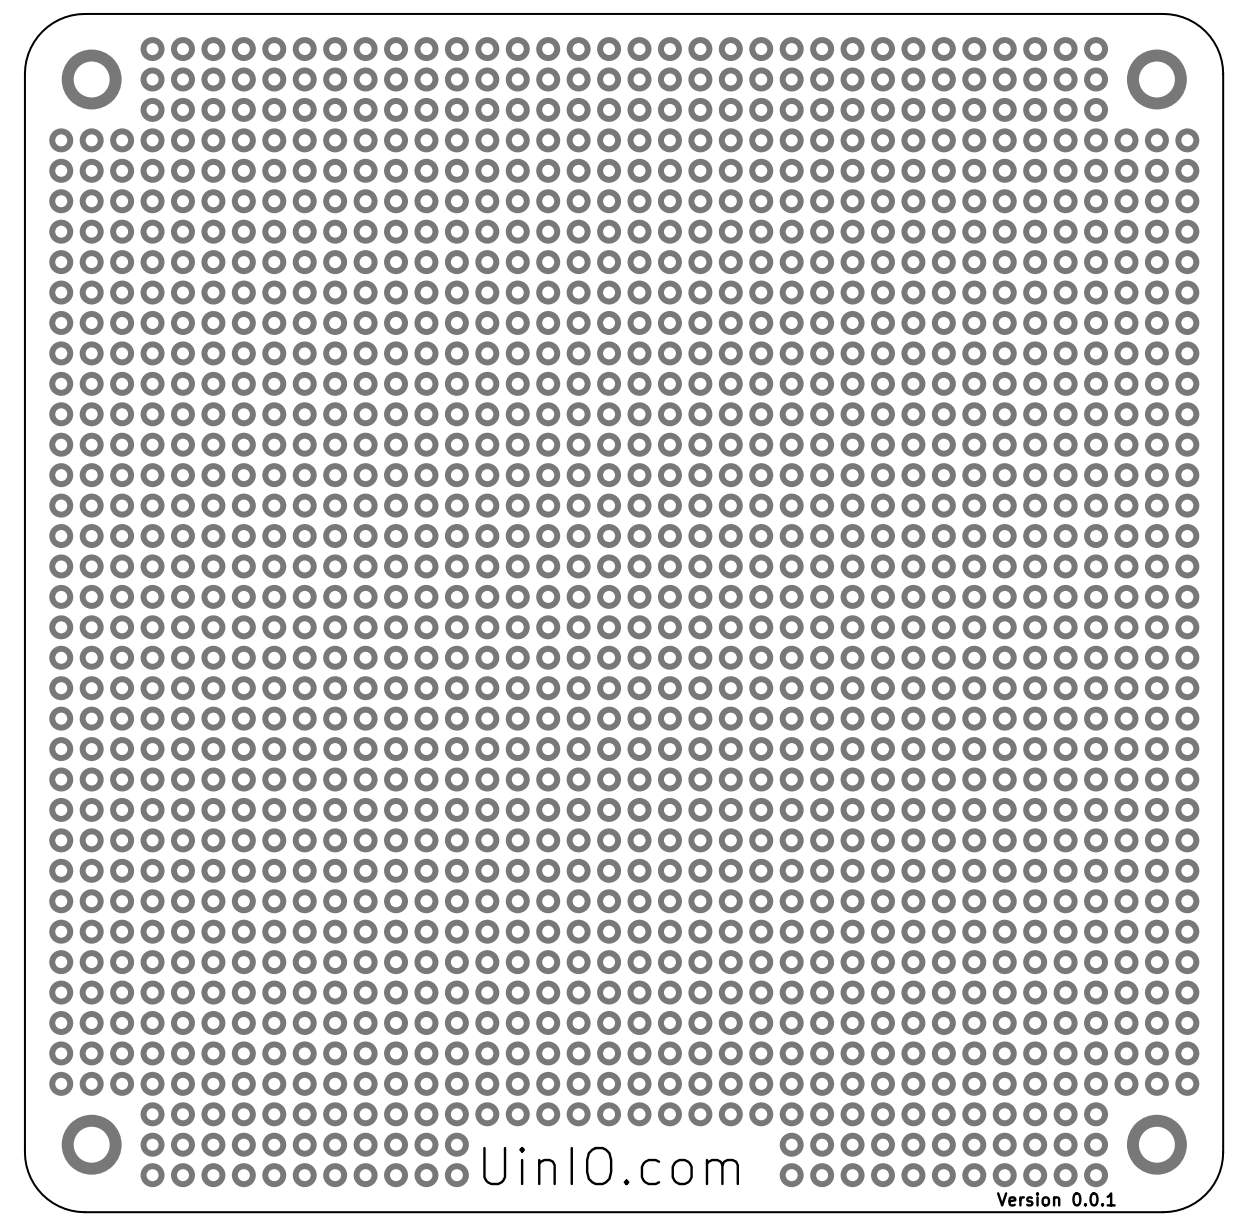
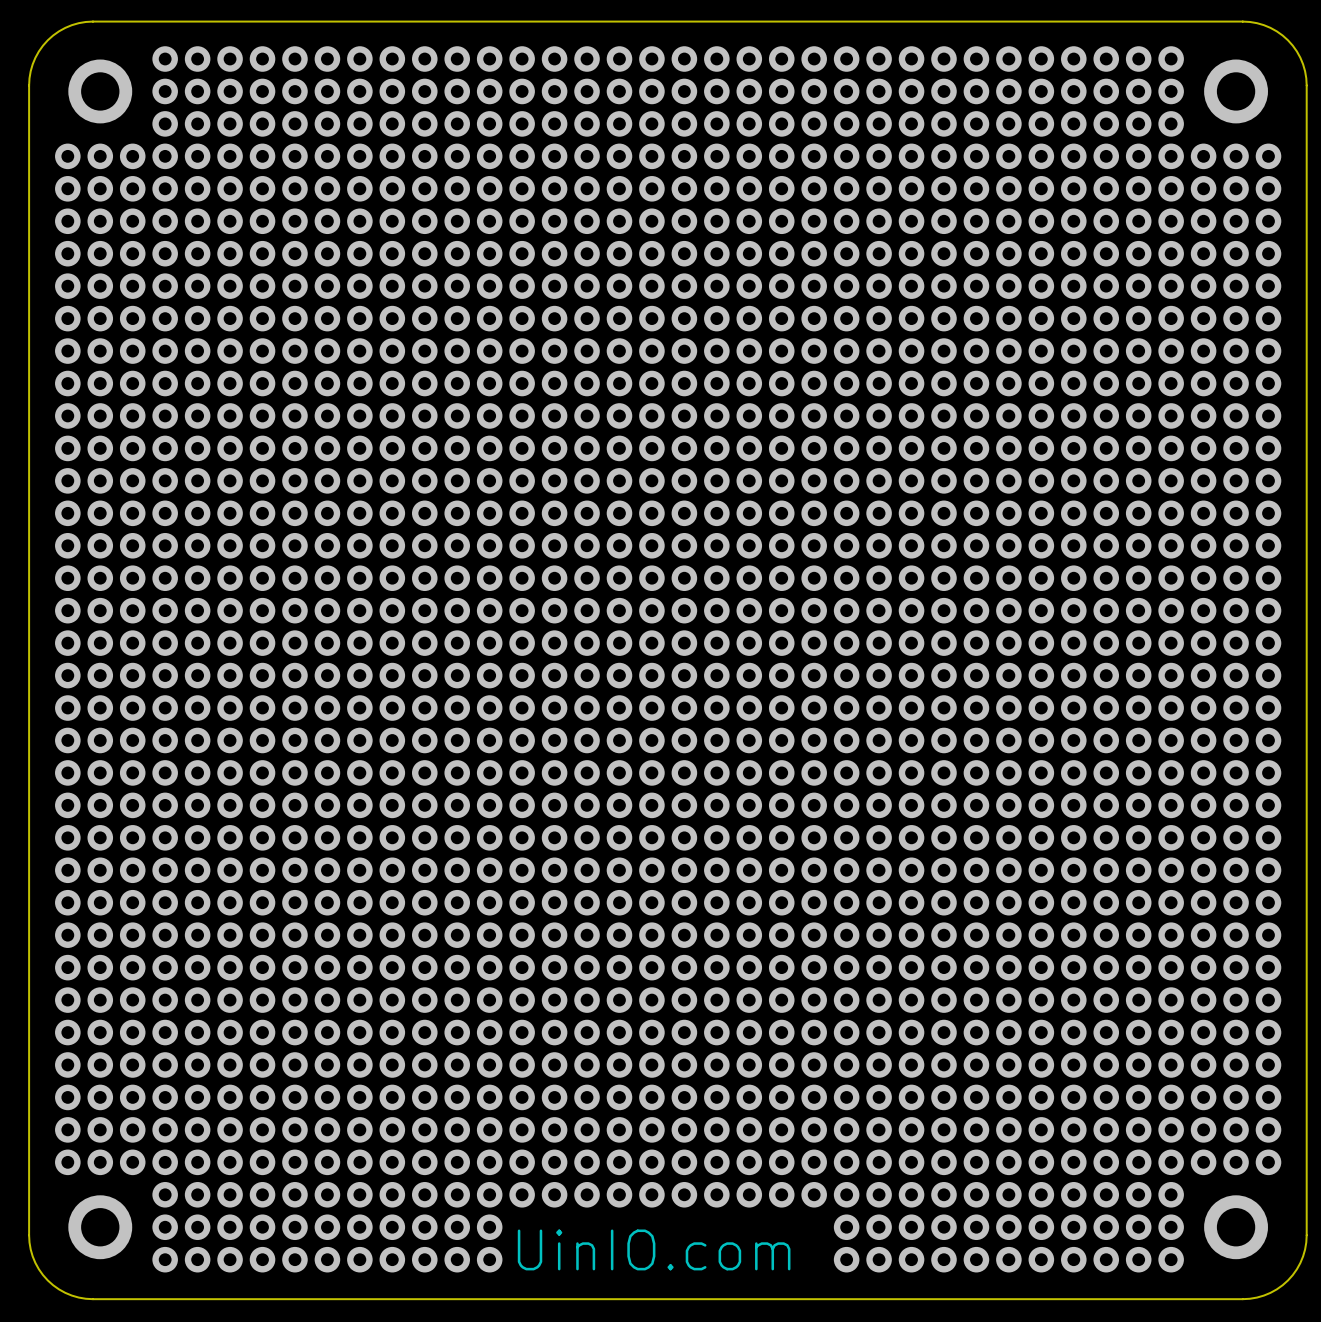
text: Version 0.0.1 (1056, 1199) -> none

